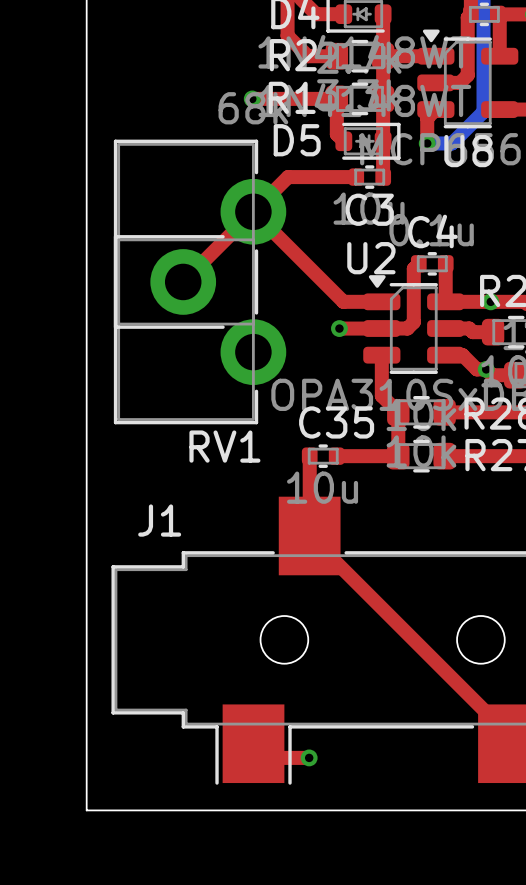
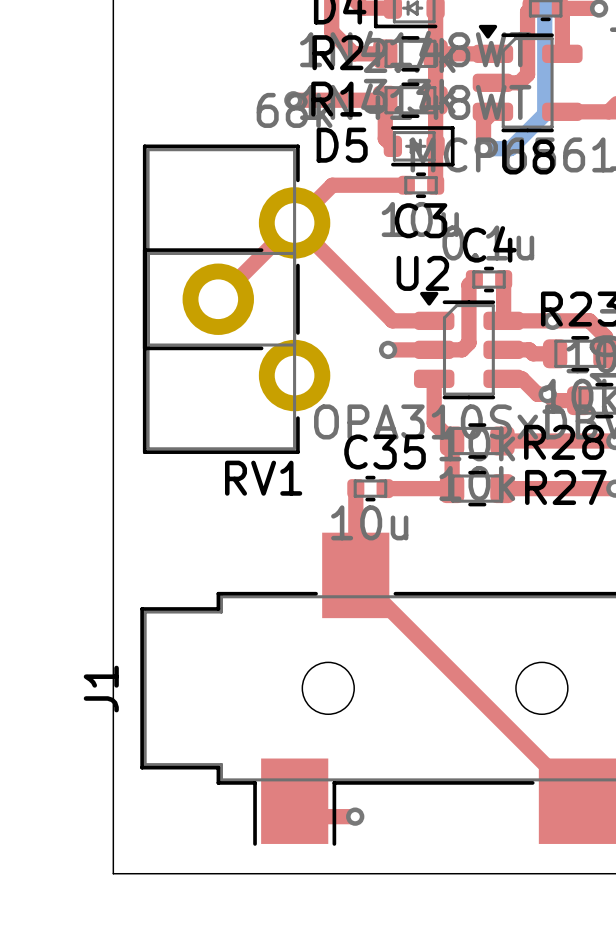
J1 name rotation: 0° (159, 520) -> 90° counterclockwise (101, 689)
J1 name position: J1 (159, 520) -> J1 (101, 689)

